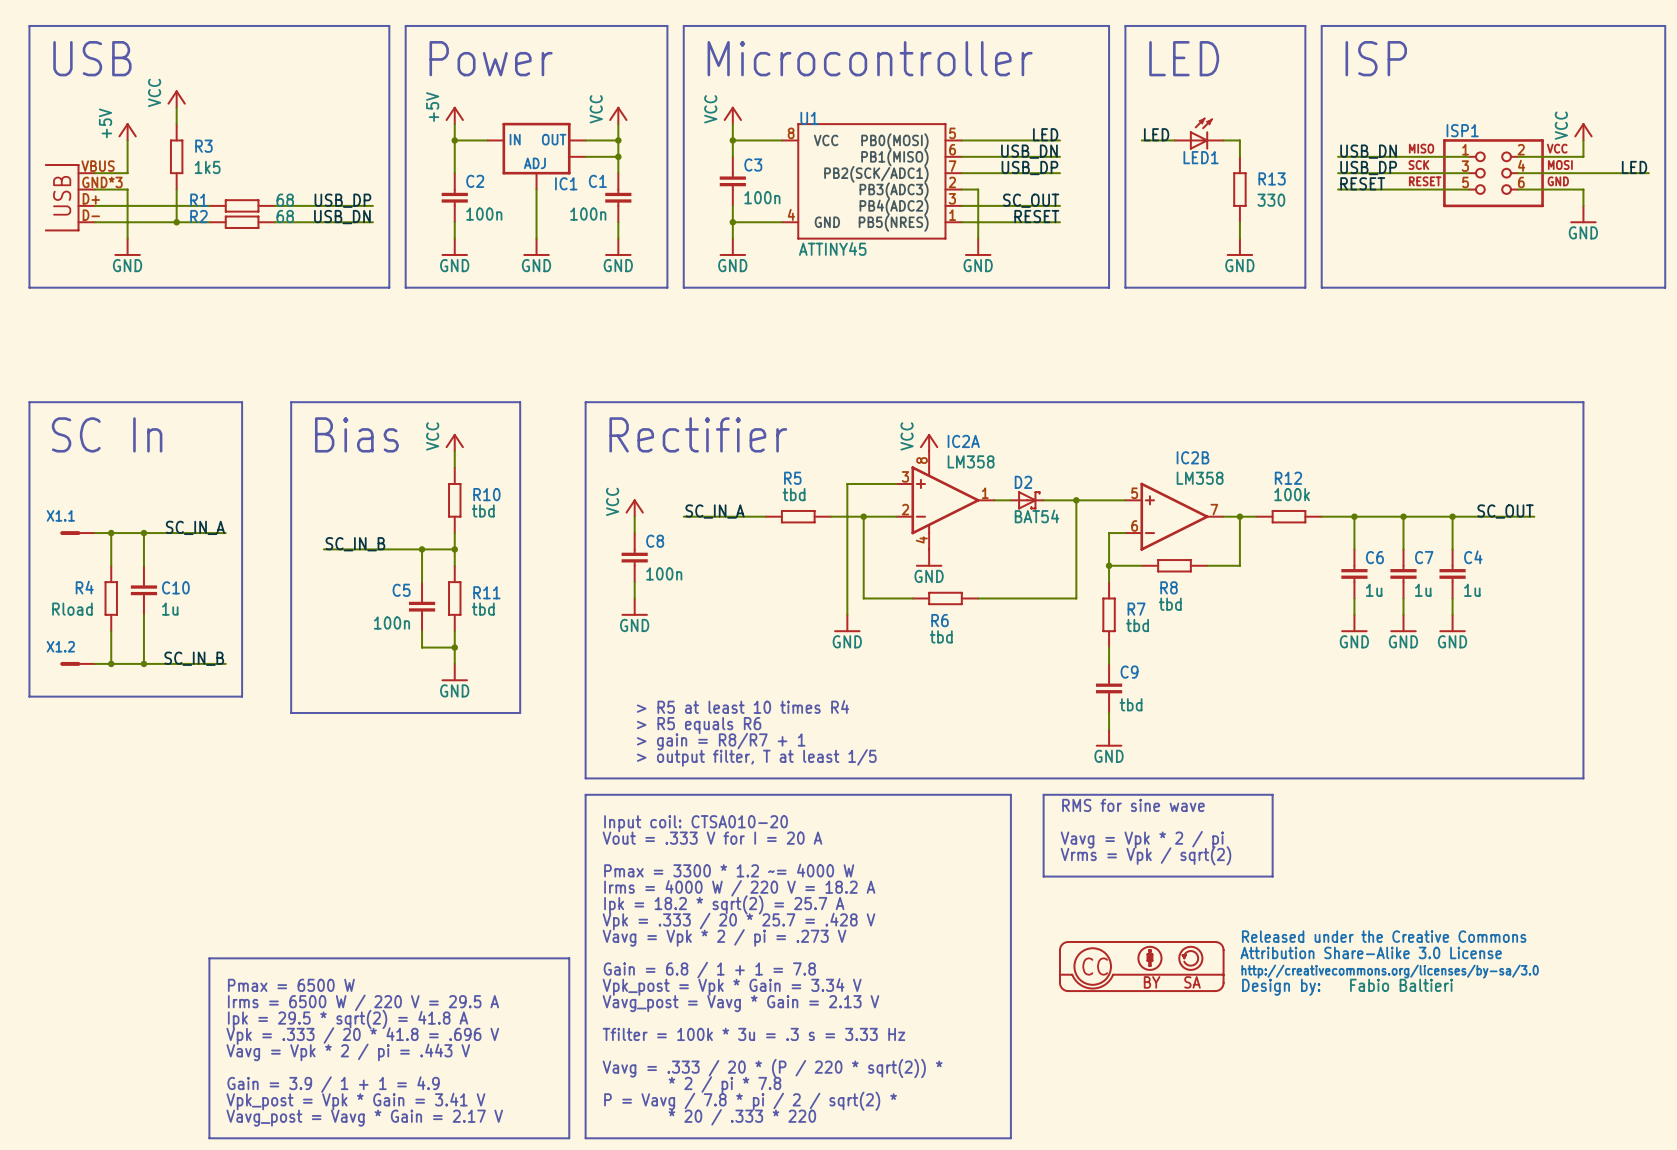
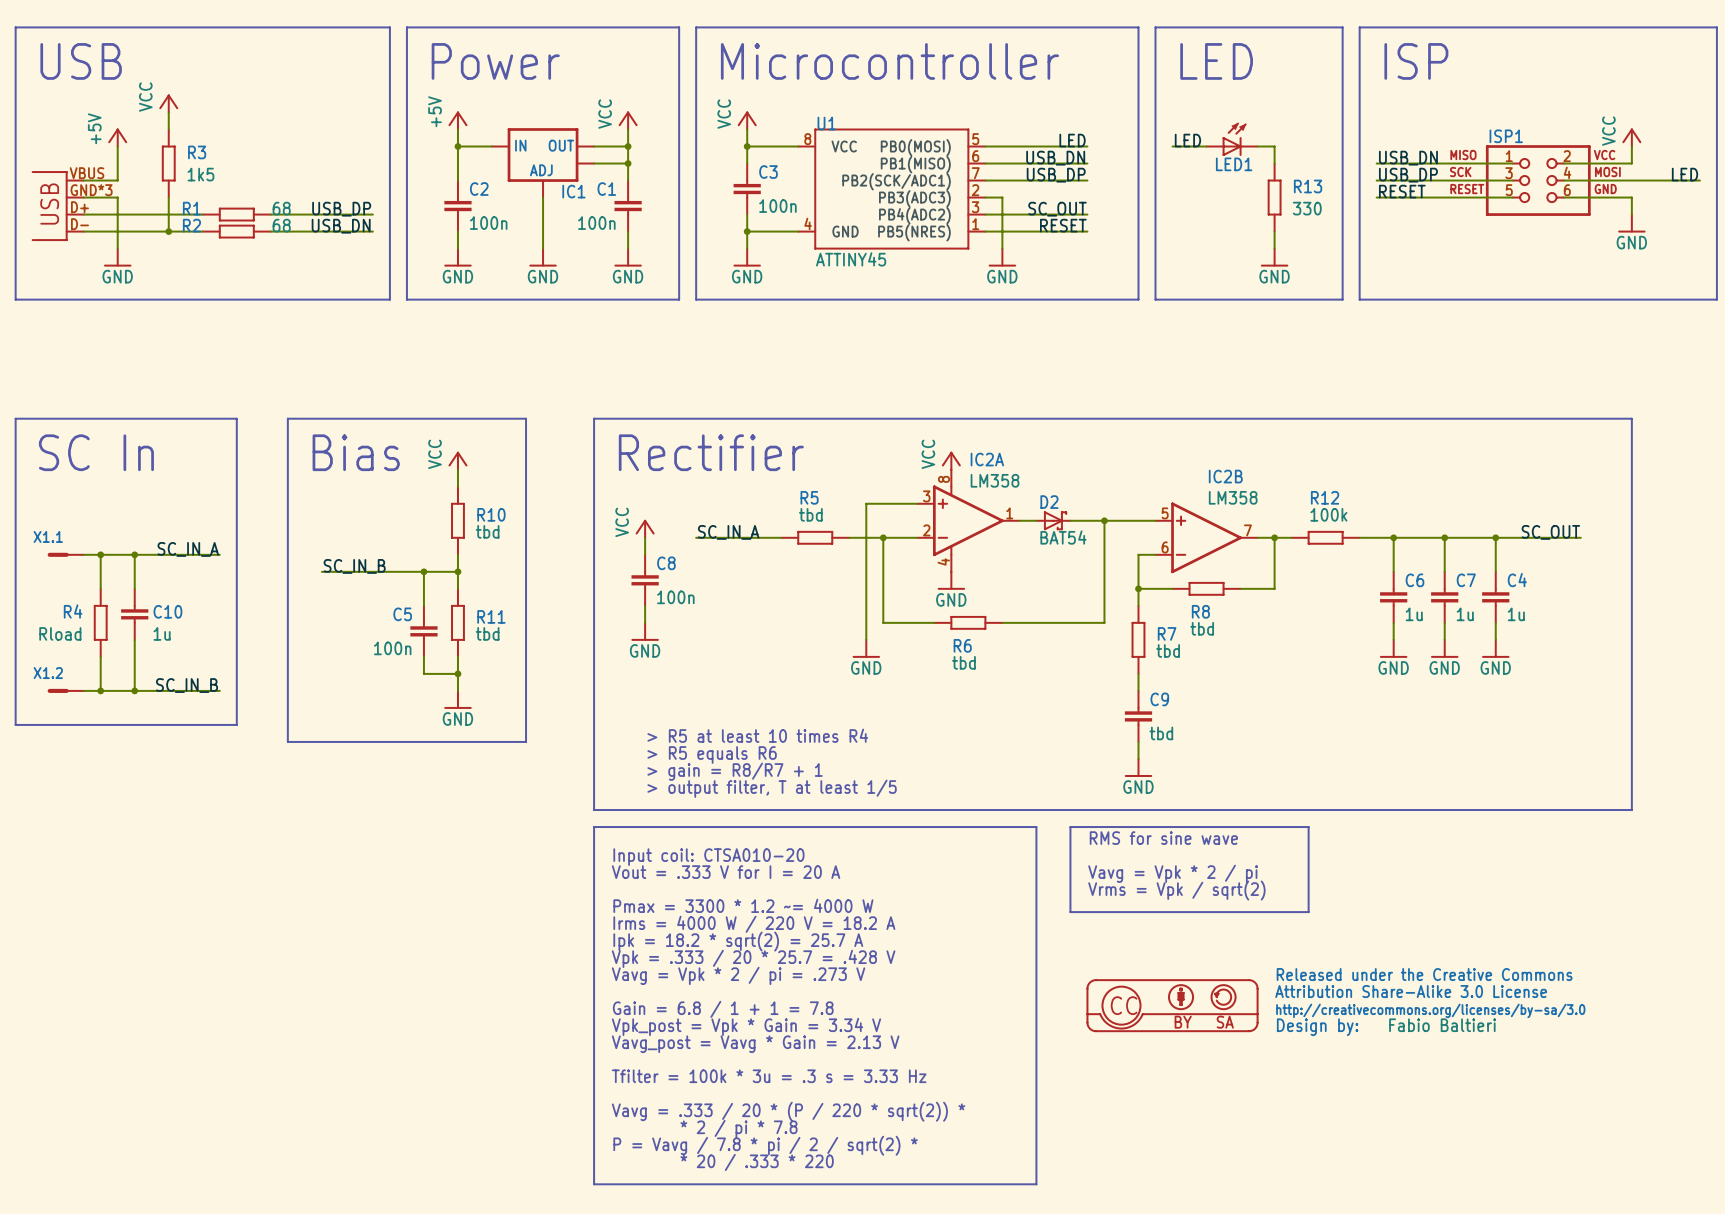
line: (209, 958) (569, 958) (569, 1138) (209, 1138) (209, 958) -> none
text: Pmax = 6500 W (291, 985) -> none
text: Irms = 6500 W / 220 V = 29.5 A (363, 1002) -> none
text: Ipk = 29.5 * sqrt(2) = 41.8 A (348, 1019) -> none
text: Vpk = .333 / 20 * 41.8 = .696 V (362, 1036) -> none
text: Vavg = Vpk * 2 / pi = .443 V (348, 1052) -> none
text: Gain = 3.9 / 1 + 1 = 4.9 (333, 1084) -> none
text: Vpk_post = Vpk * Gain = 3.41 V (355, 1101) -> none
text: Vavg_post = Vavg * Gain = 2.17 V (364, 1118) -> none

